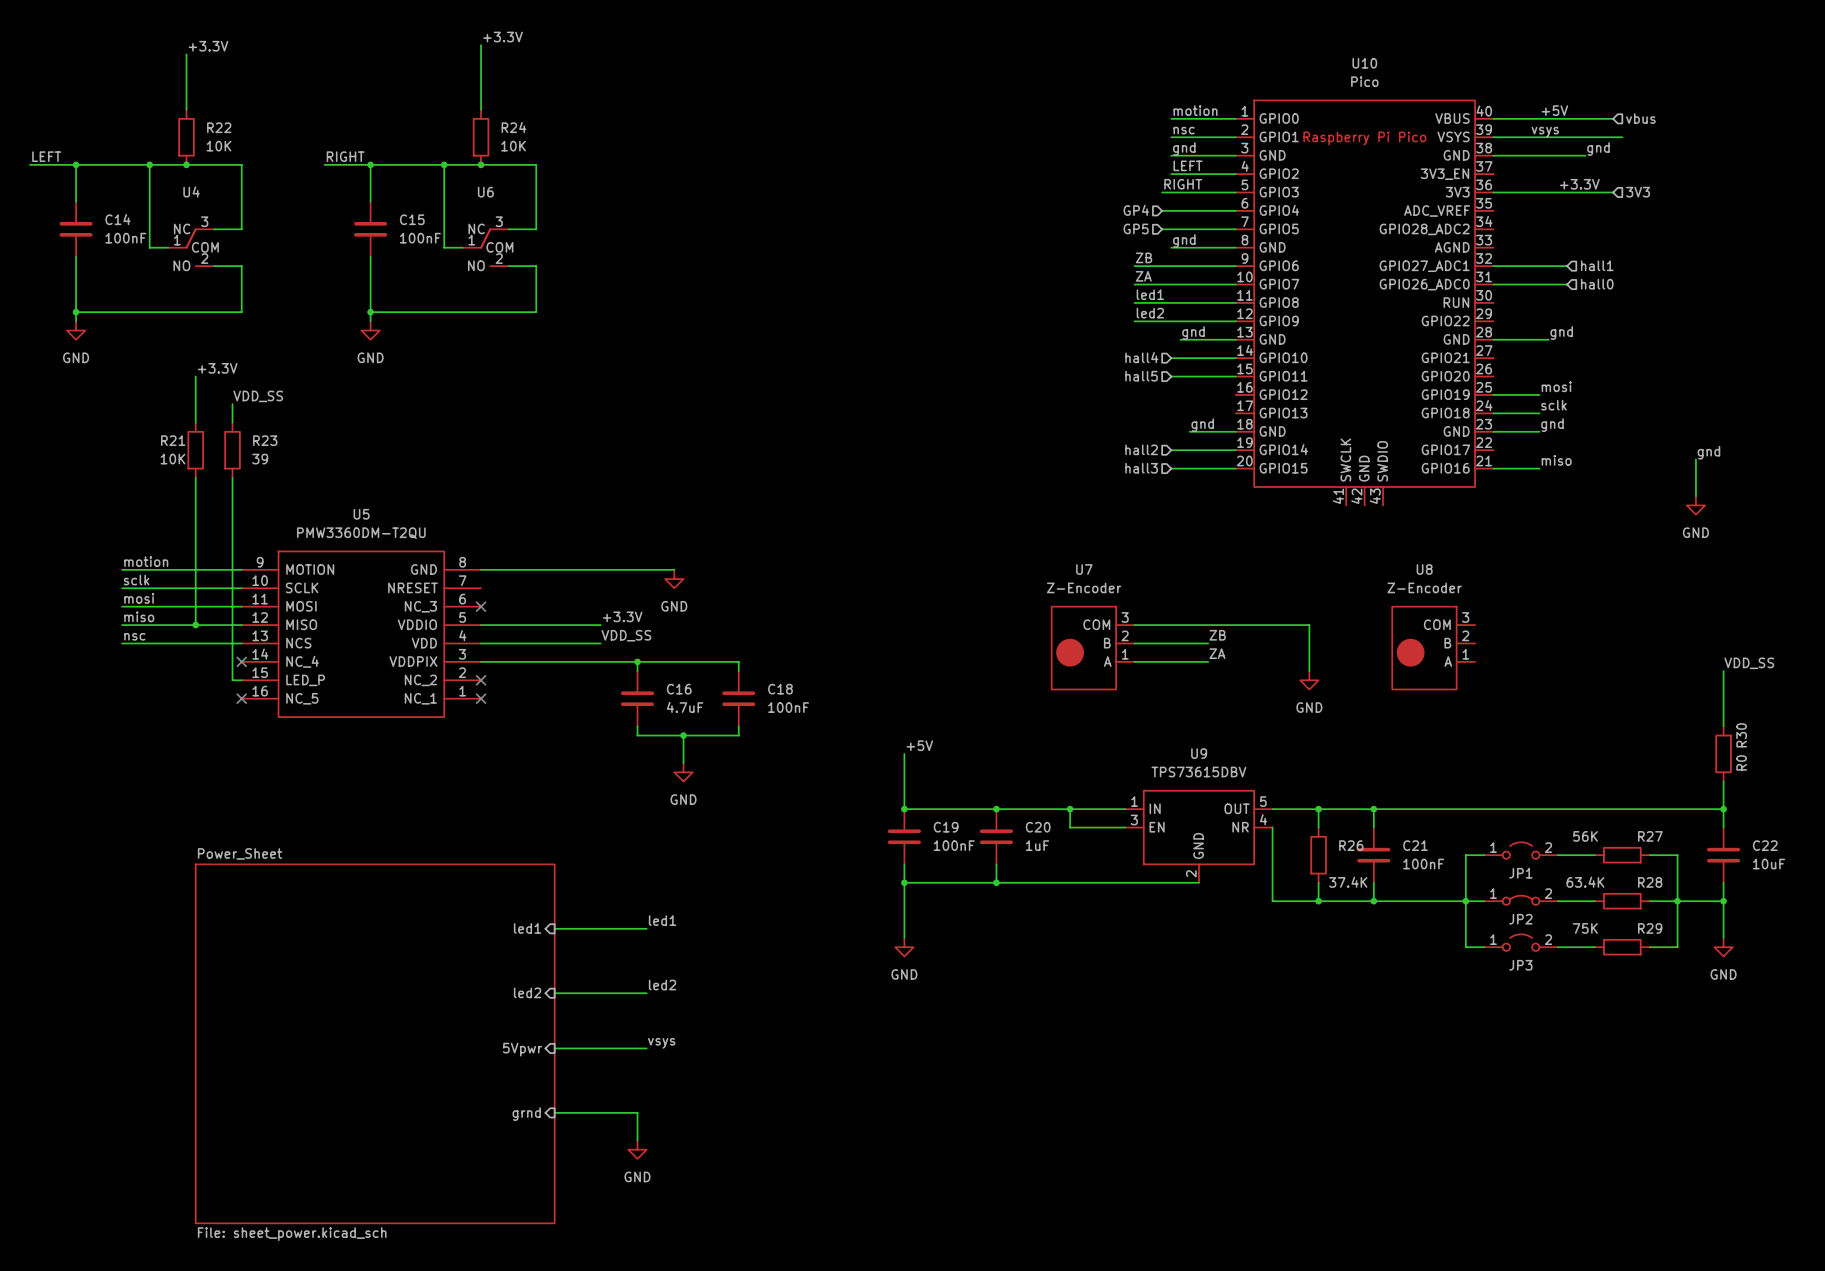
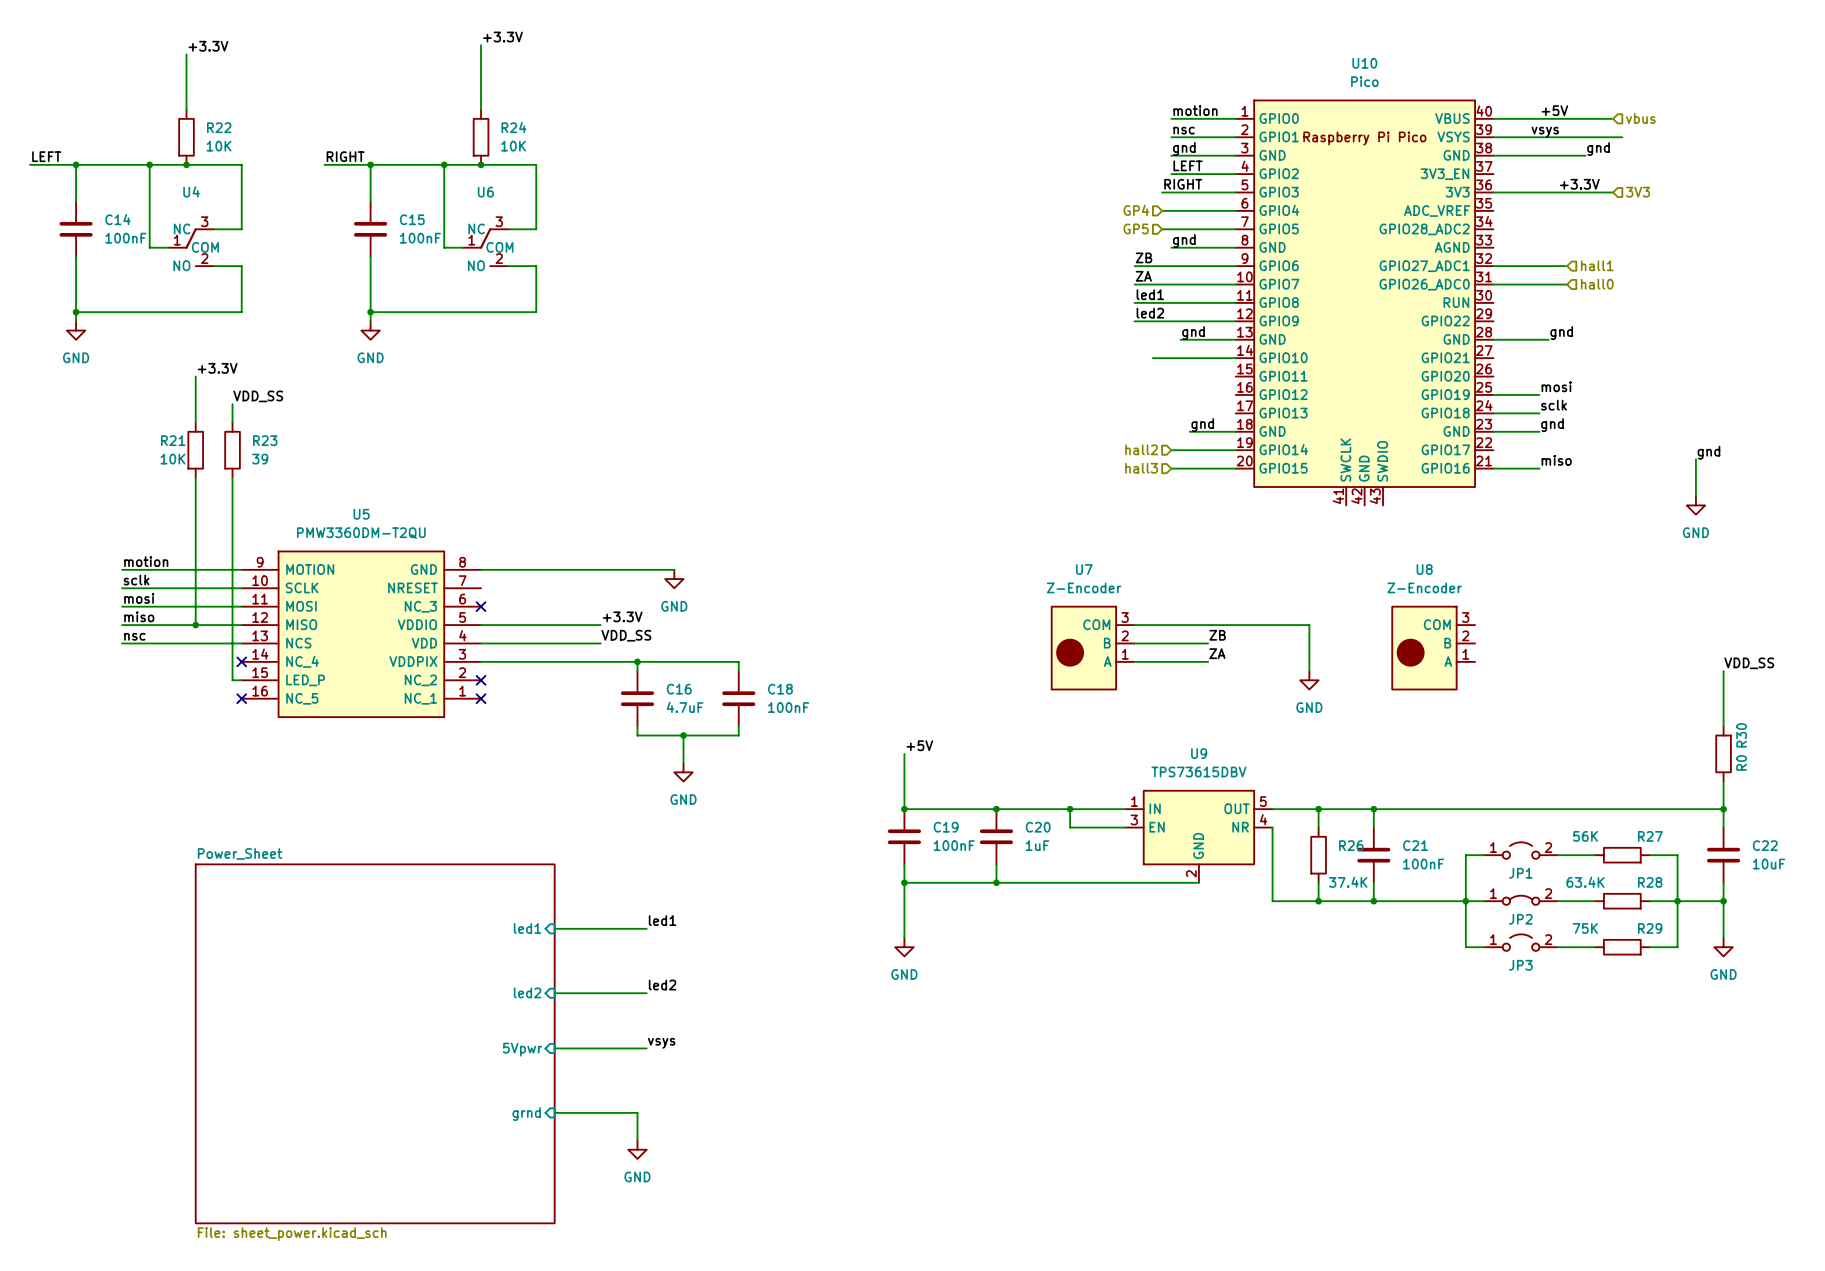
hierarchical label: hall4 (1141, 357) -> none
wire: none -> (1152, 358) (1171, 358)
hierarchical label: hall5 (1141, 376) -> none
wire: (1171, 376) (1235, 376) -> none

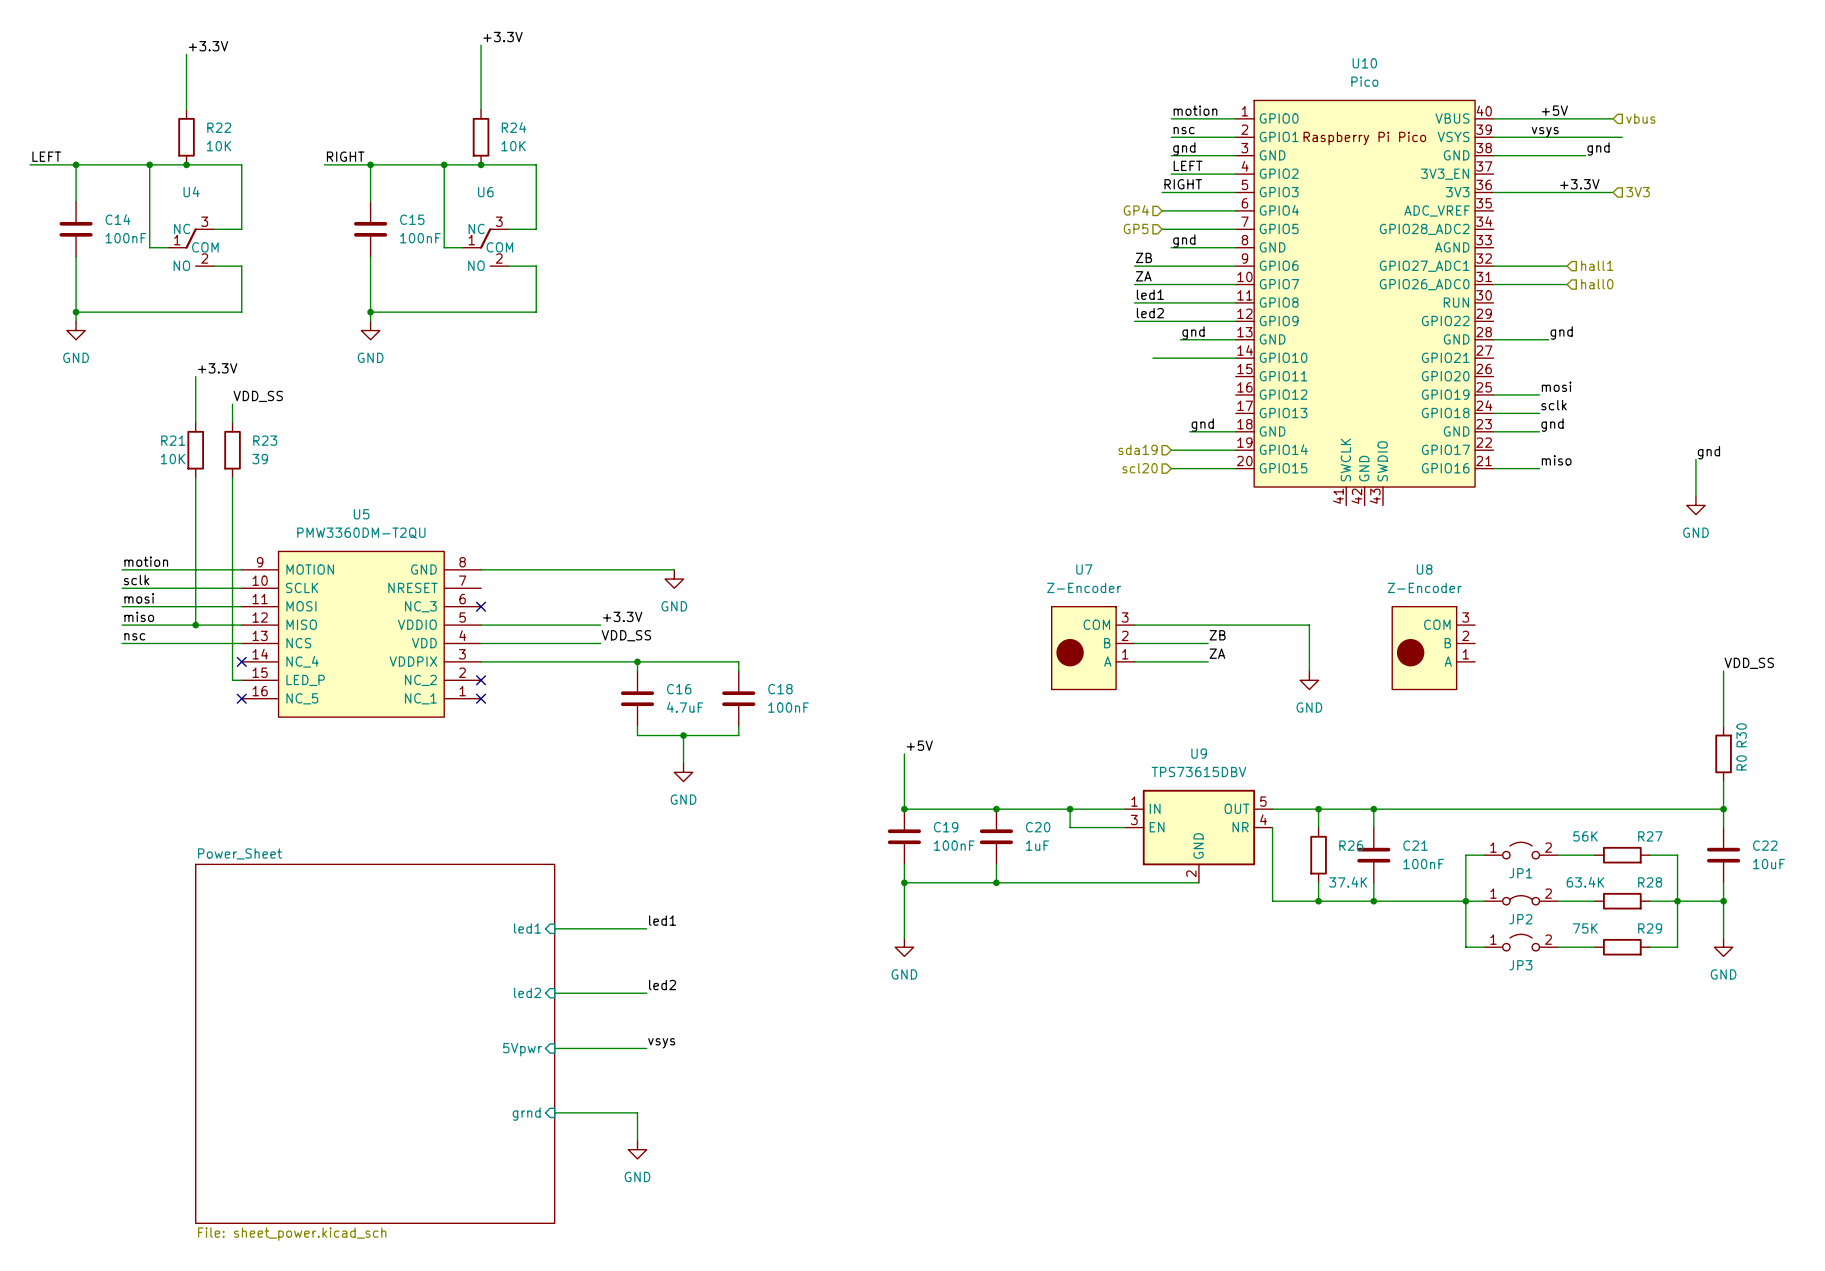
hierarchical label: hall2 (1141, 449) -> sda19 (1138, 449)
hierarchical label: hall3 (1141, 468) -> scl20 (1140, 468)

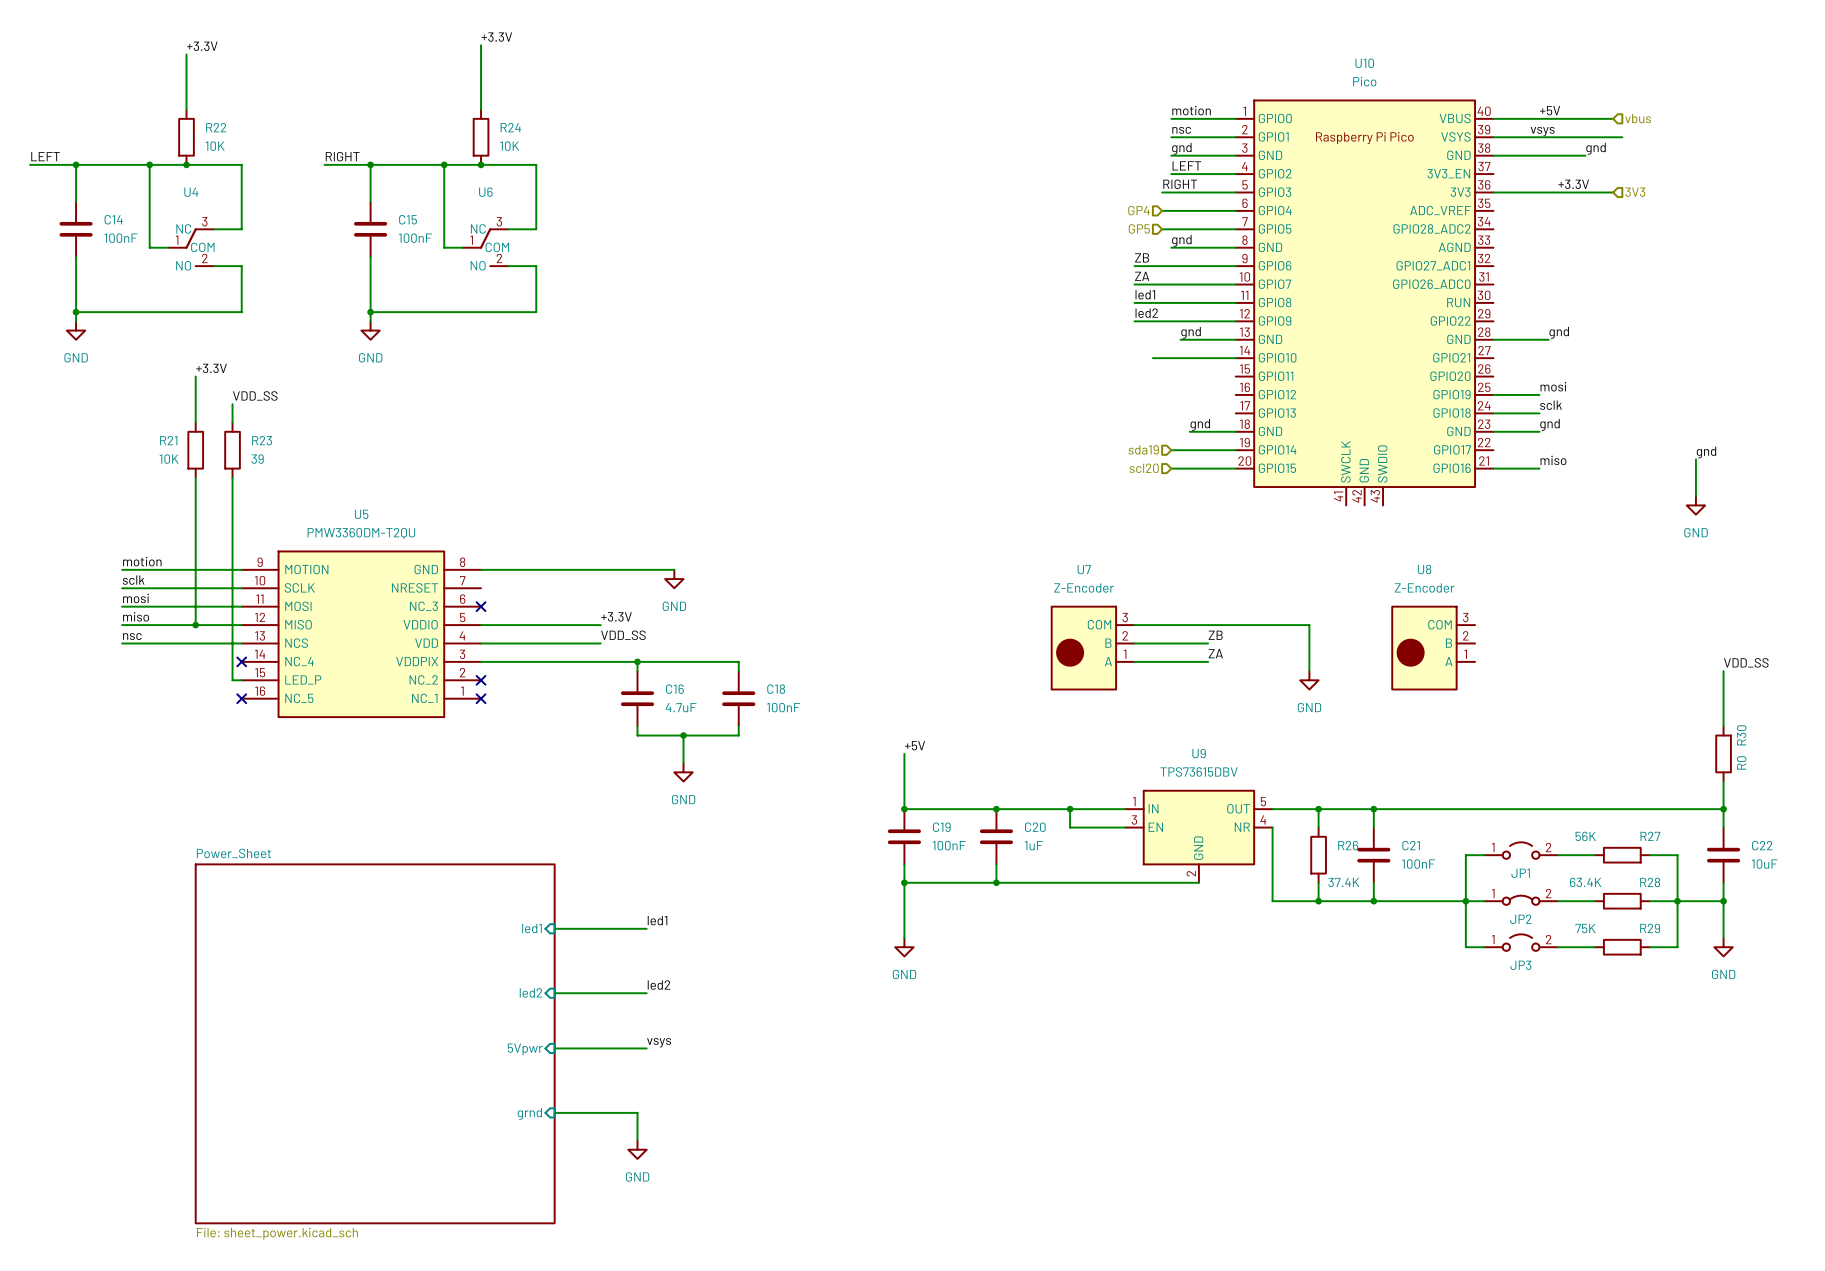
hierarchical label: hall1 (1597, 265) -> none
wire: (1493, 266) (1567, 266) -> none
wire: (1493, 284) (1567, 284) -> none
hierarchical label: hall0 (1597, 284) -> none

